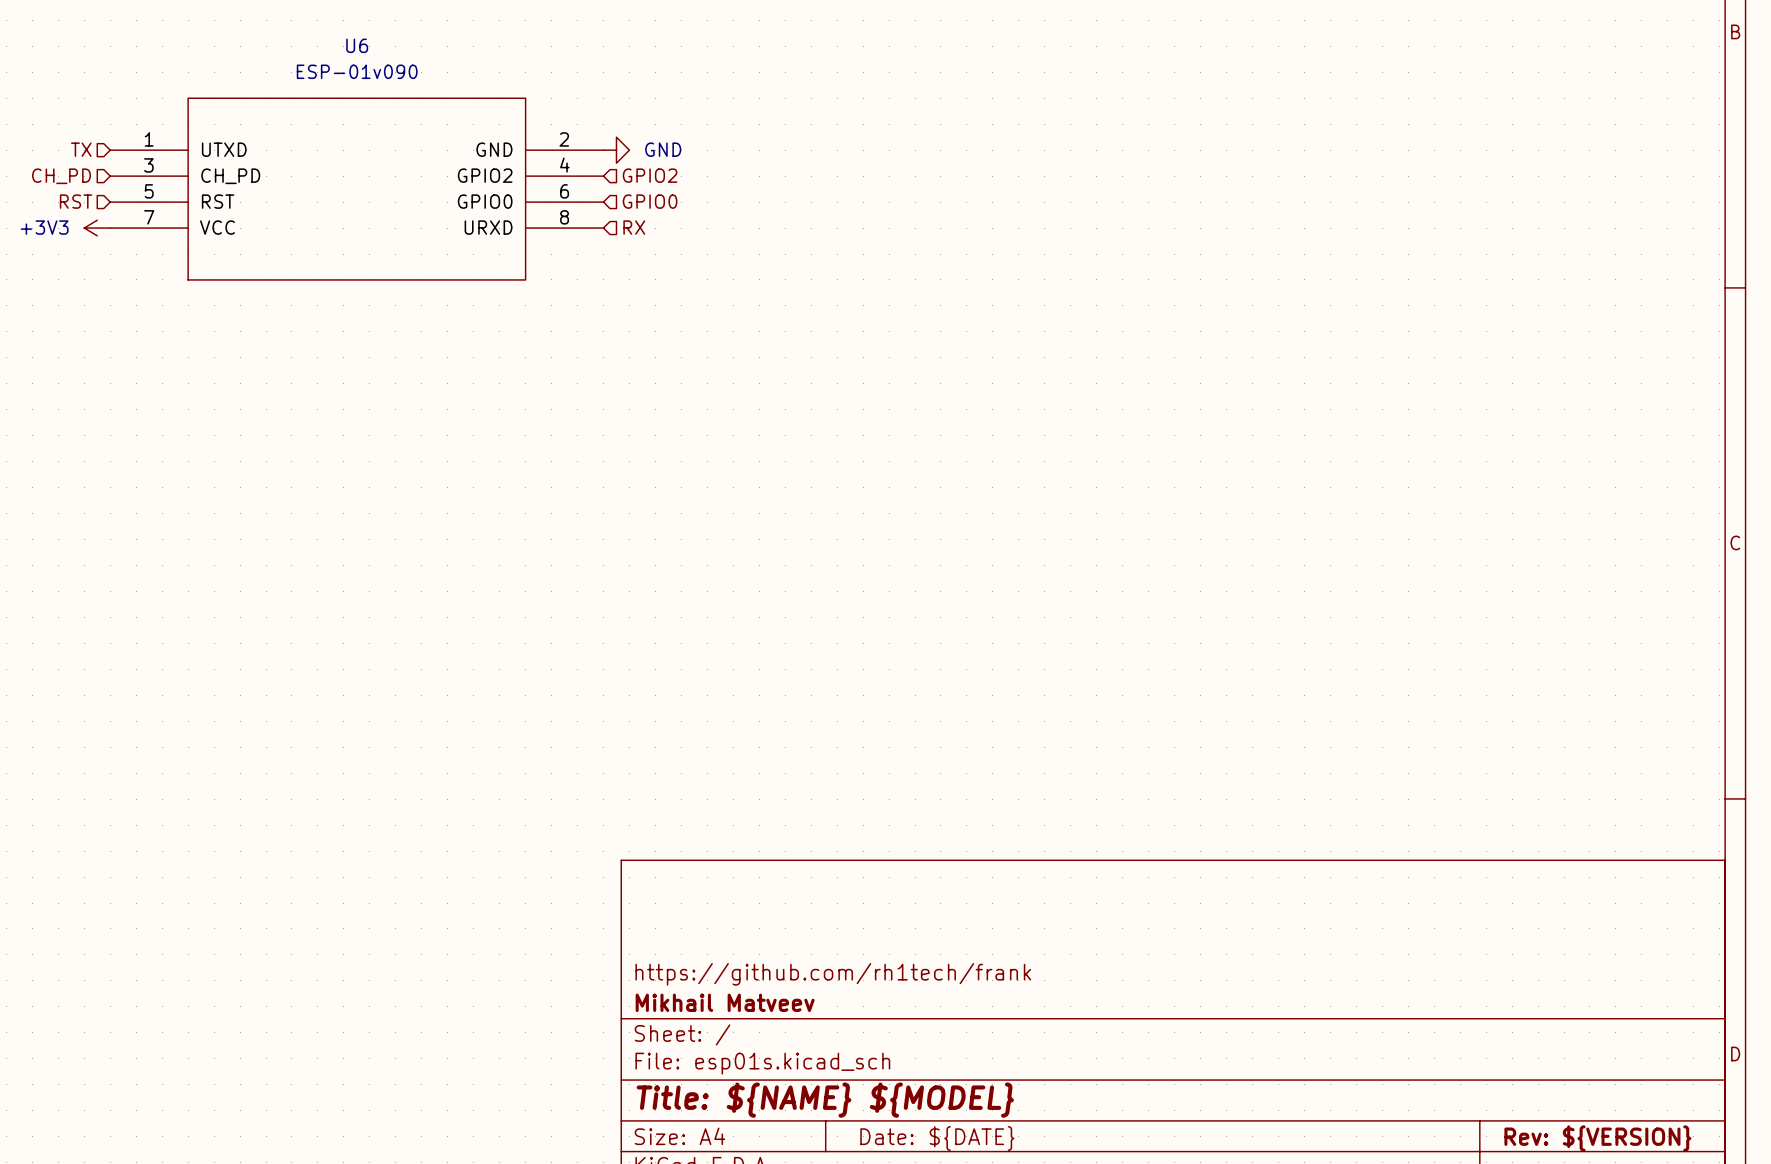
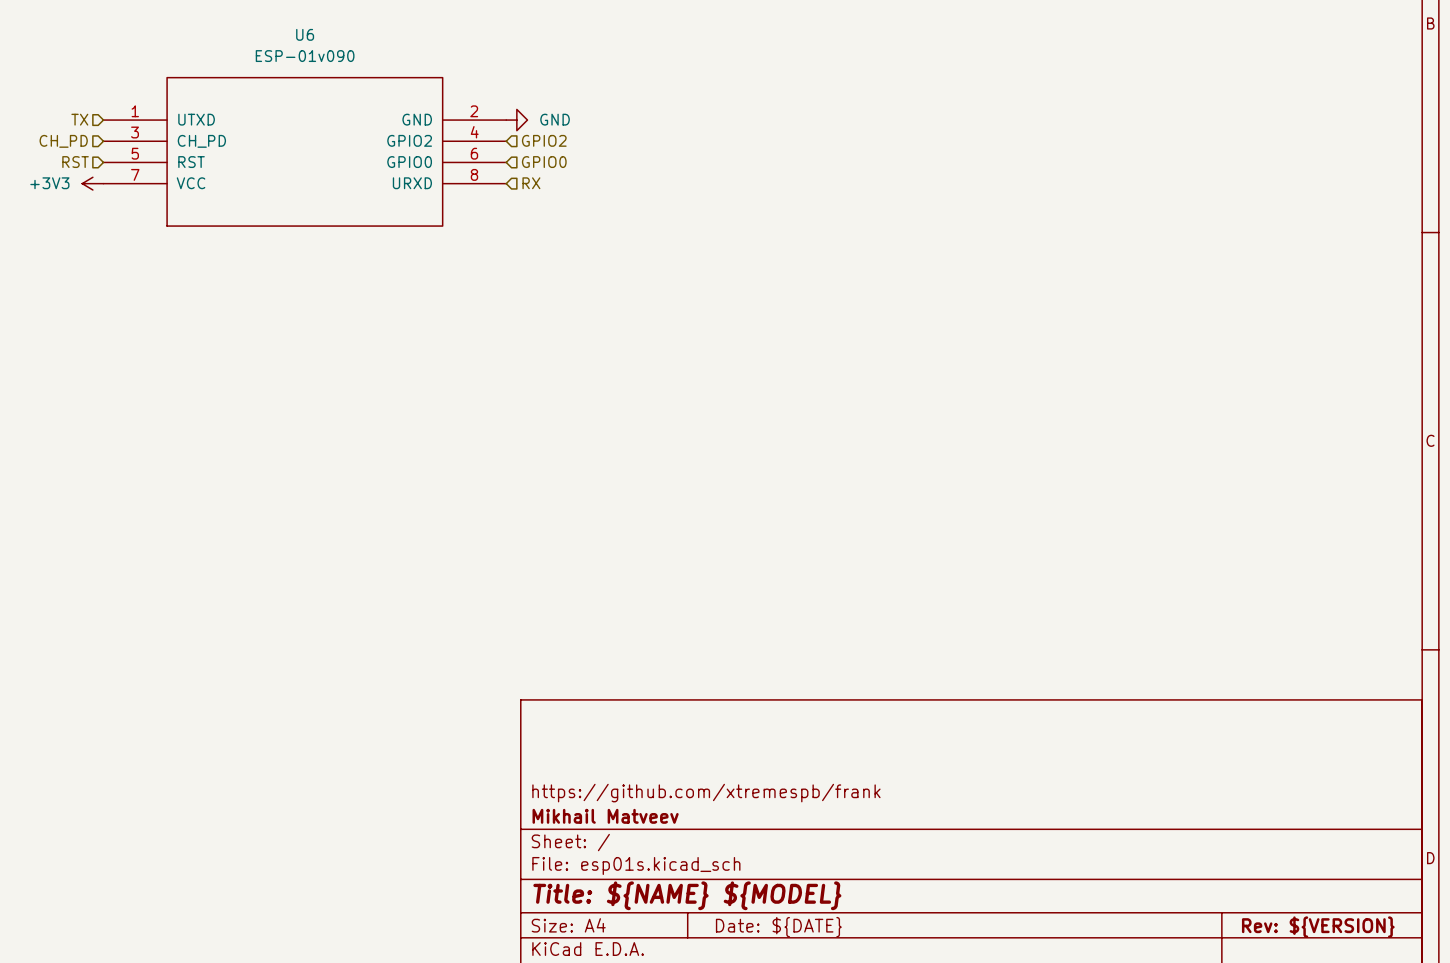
title block: https://github.com/rh1tech/frank (833, 974) -> https://github.com/xtremespb/frank (706, 793)

